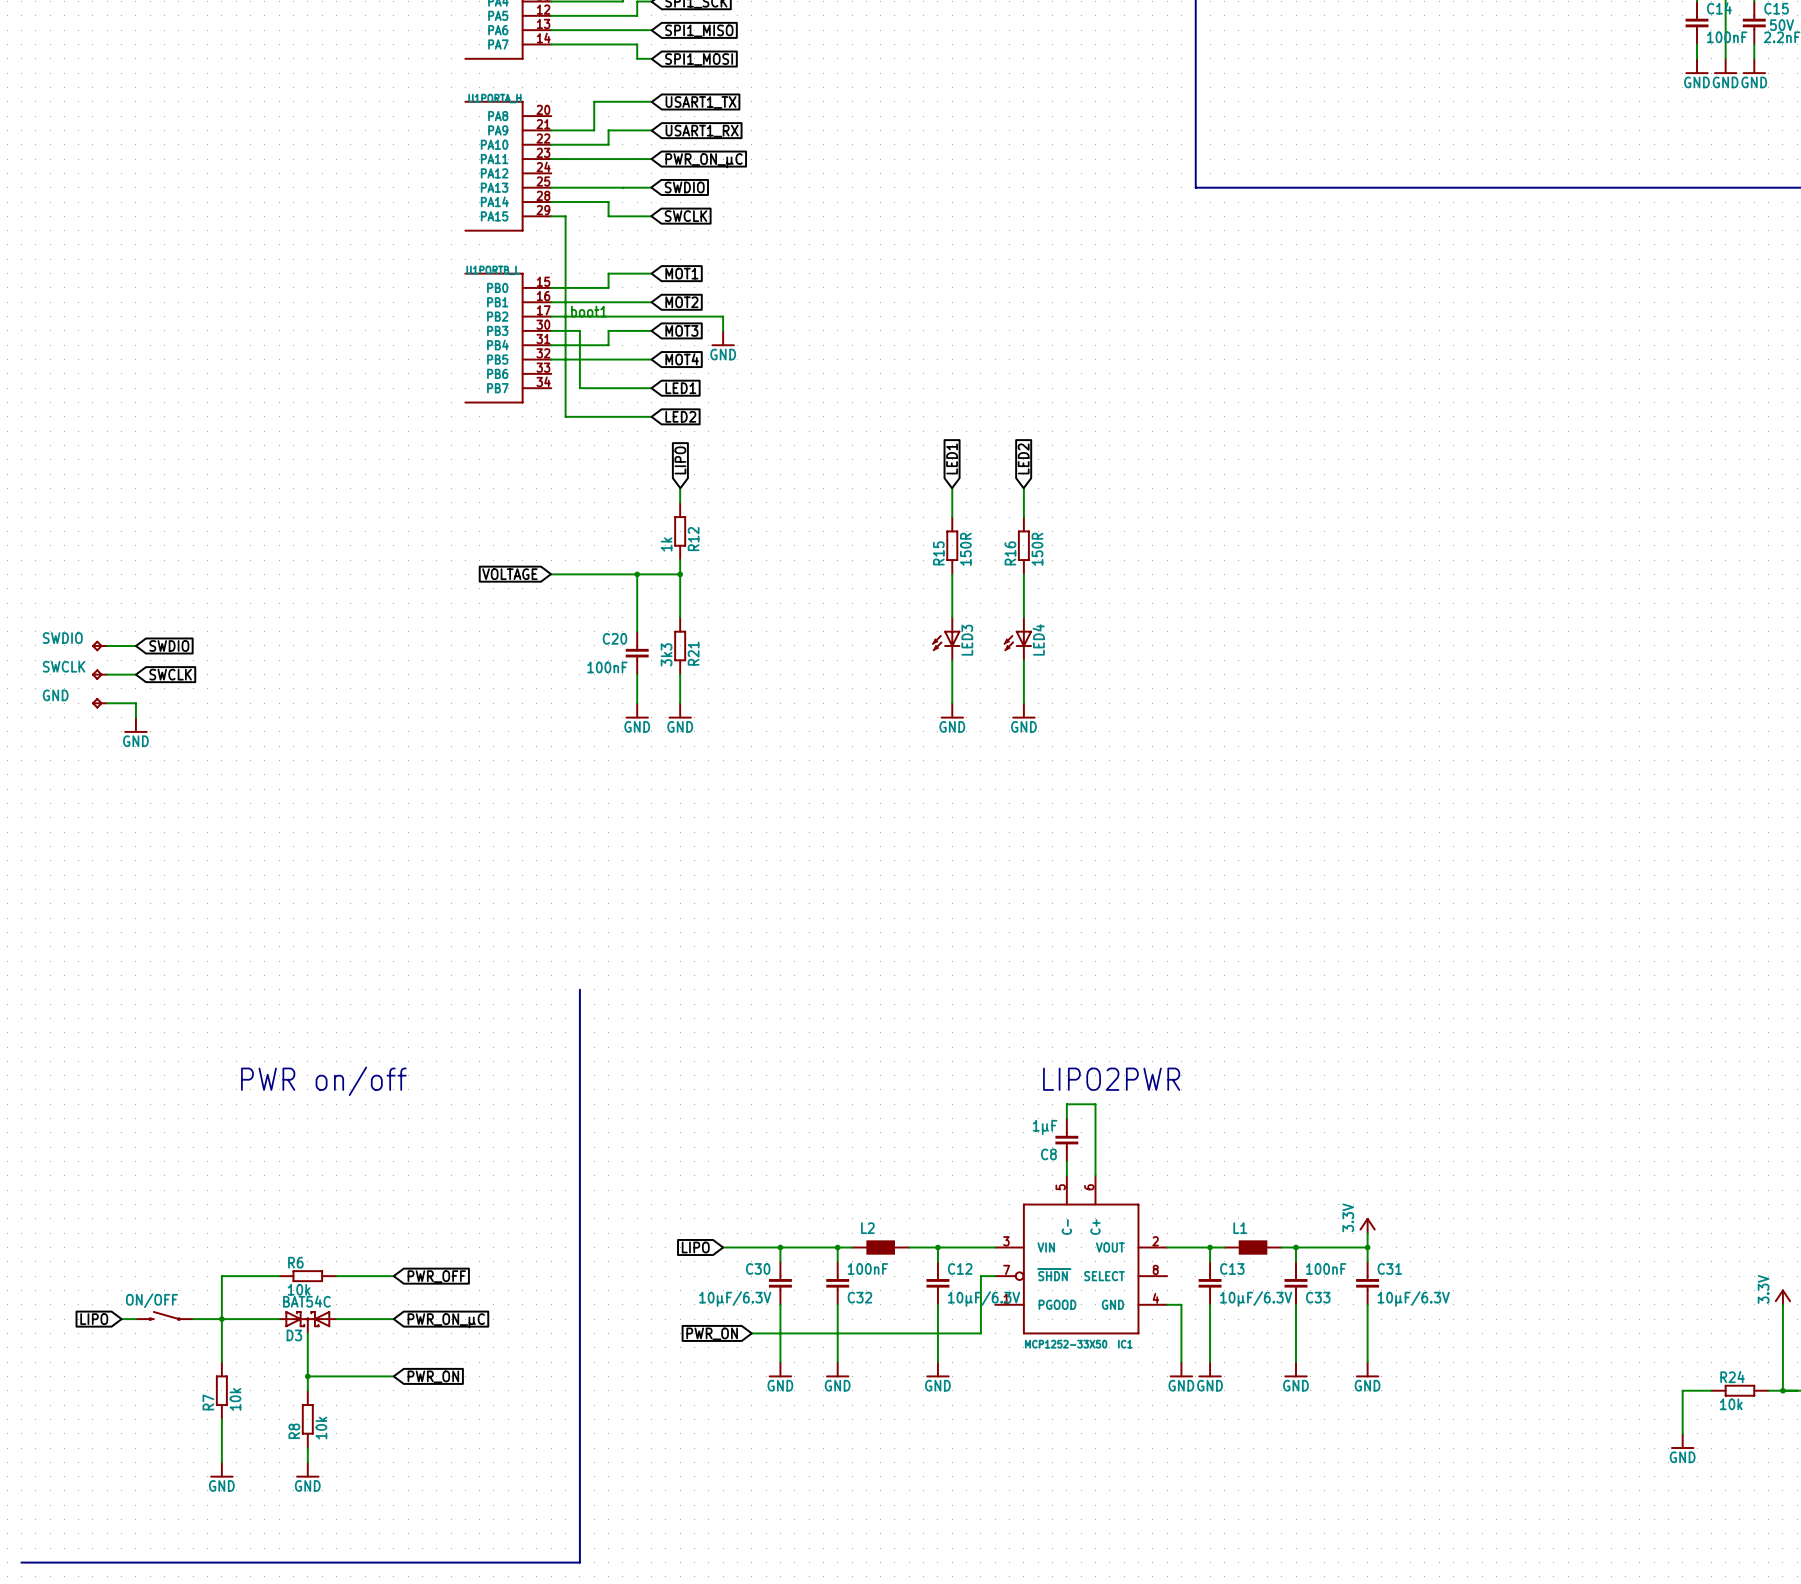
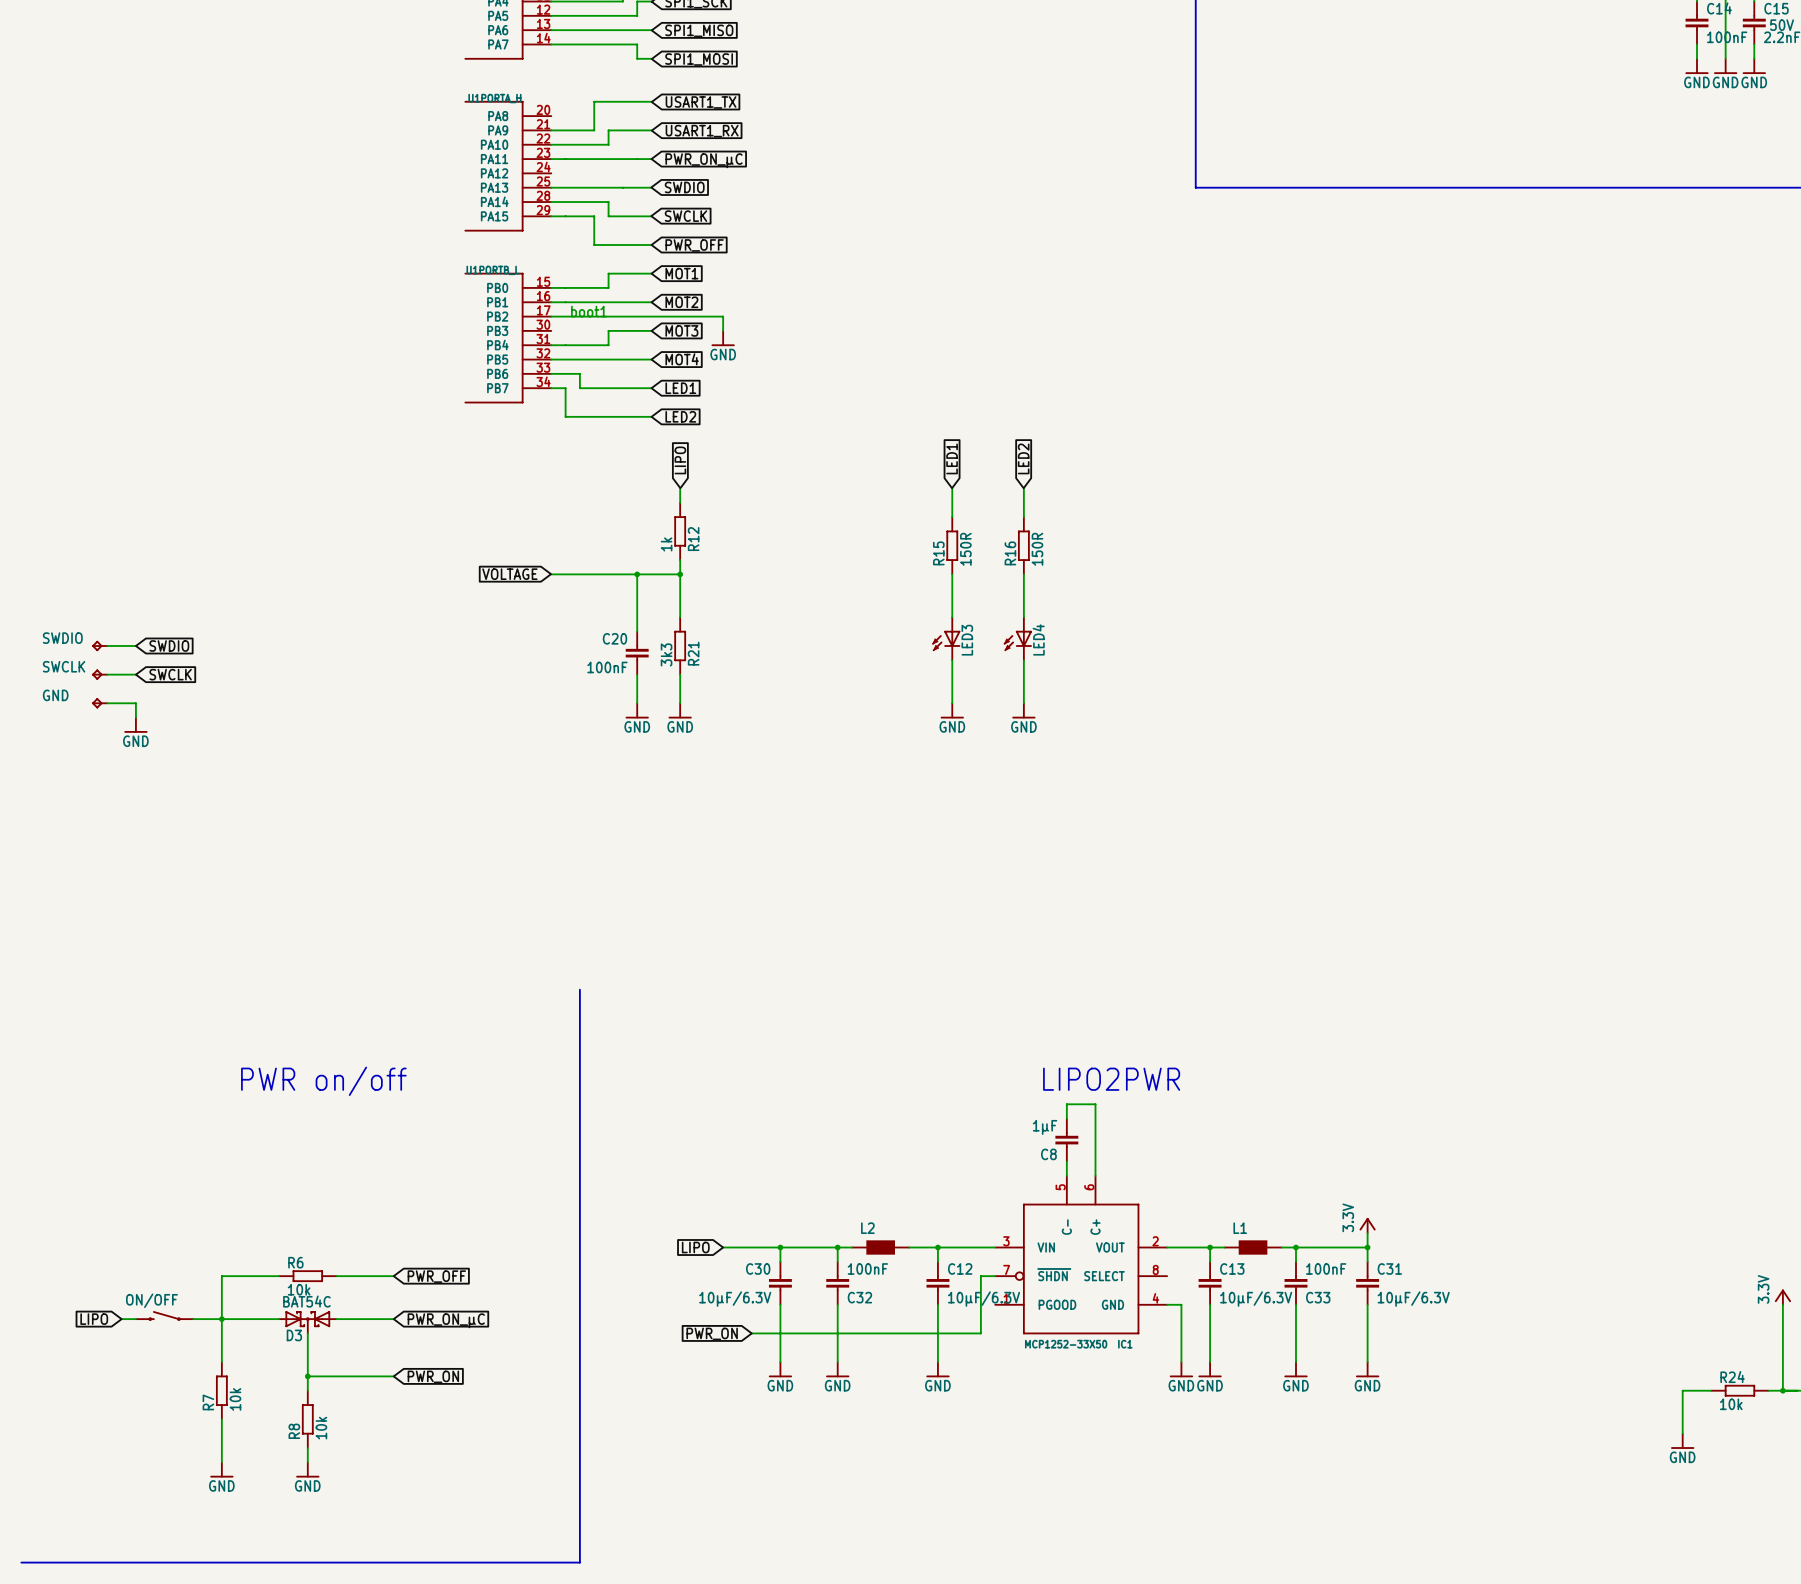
wire: (565, 216) (565, 388) -> (565, 216) (594, 216) (594, 244) (651, 244)
global label: none -> PWR_OFF (694, 245)
wire: (551, 330) (579, 330) (579, 373) -> (551, 373) (579, 373)
wire: none -> (551, 388) (565, 388)

